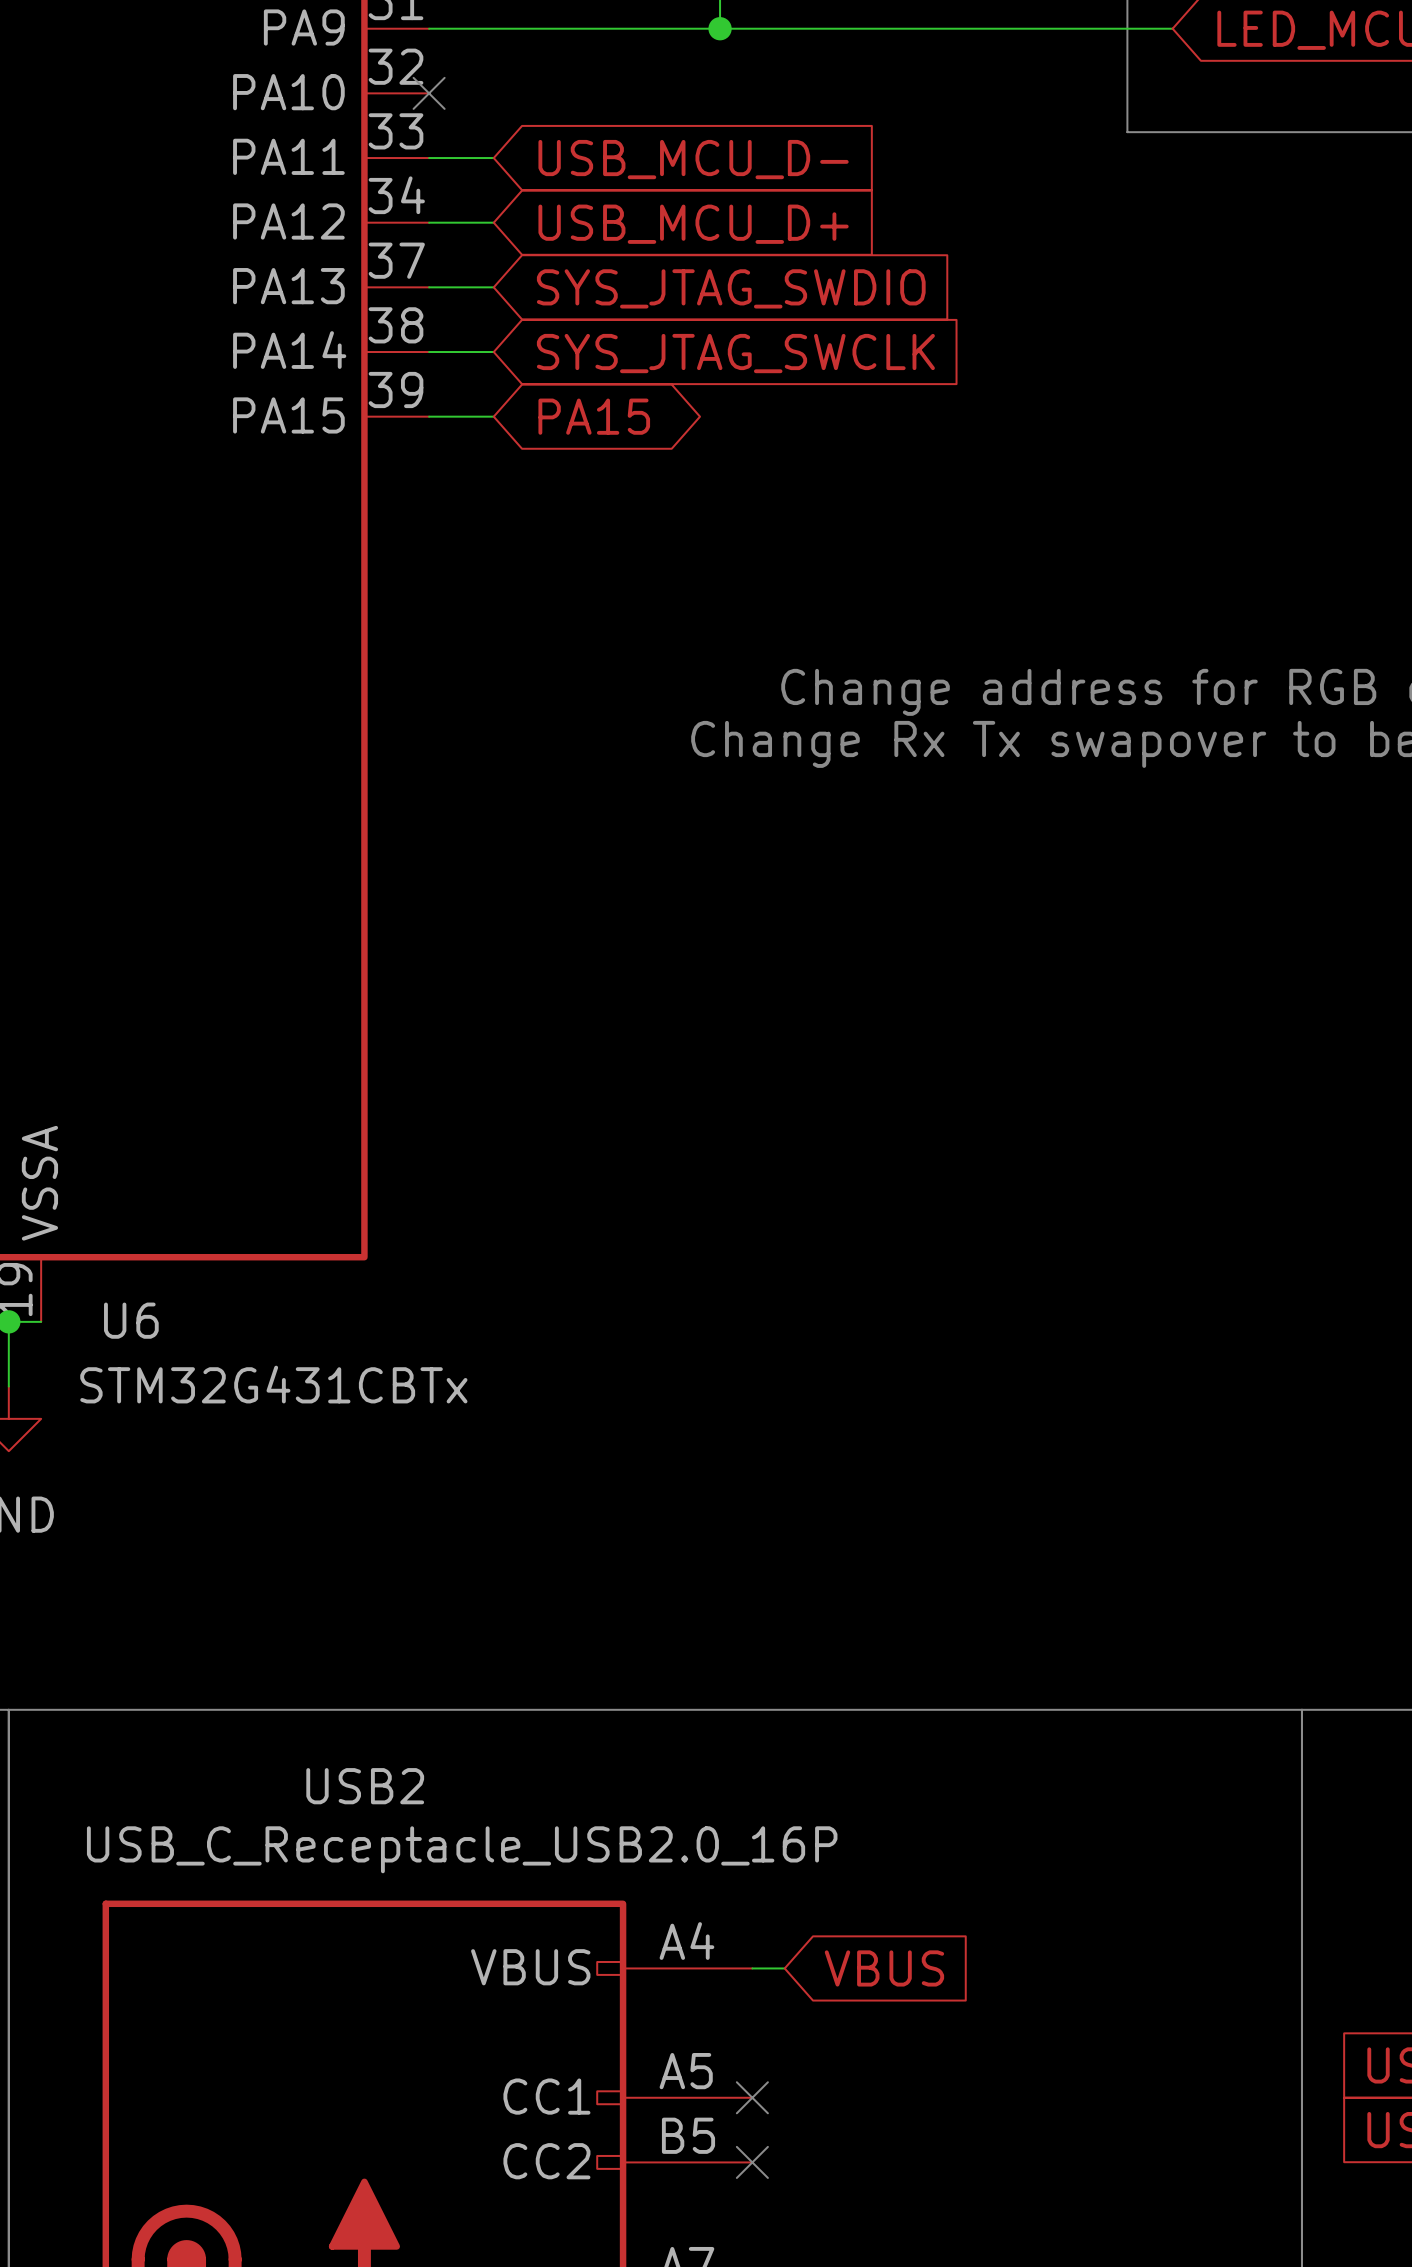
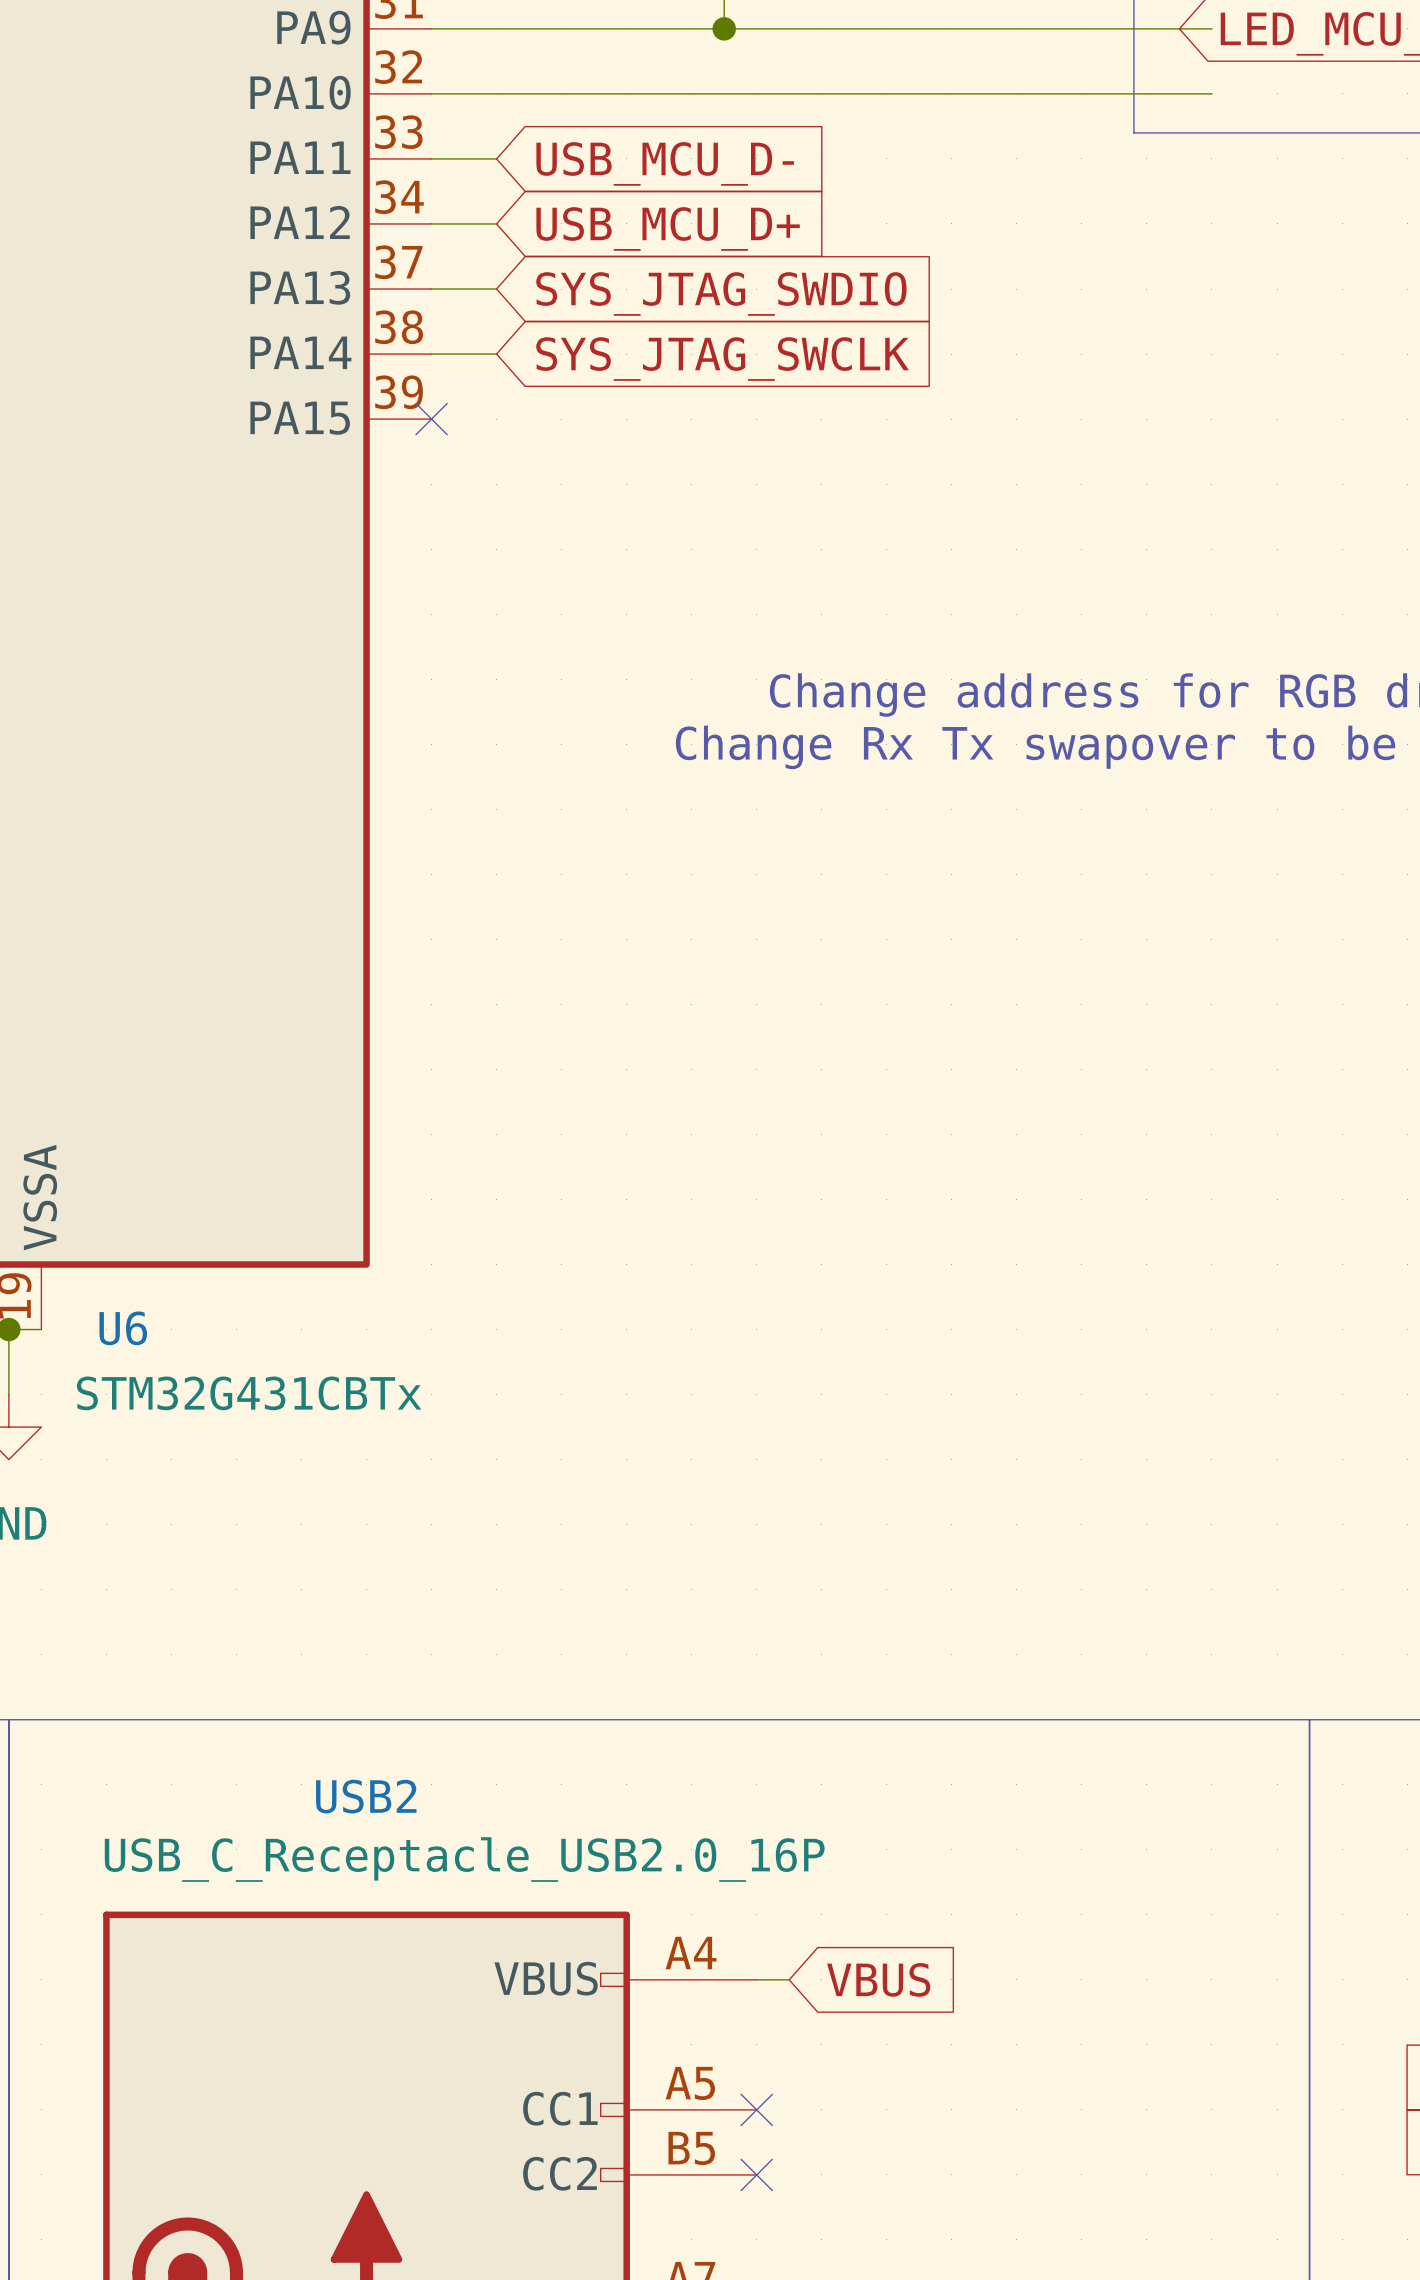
wire: none -> (1179, 28) (1211, 28)
wire: none -> (431, 93) (1211, 93)
no-connect mark: (429, 93) -> none
wire: (429, 416) (493, 416) -> none
no-connect mark: none -> (431, 419)
global label: PA15 (594, 416) -> none

